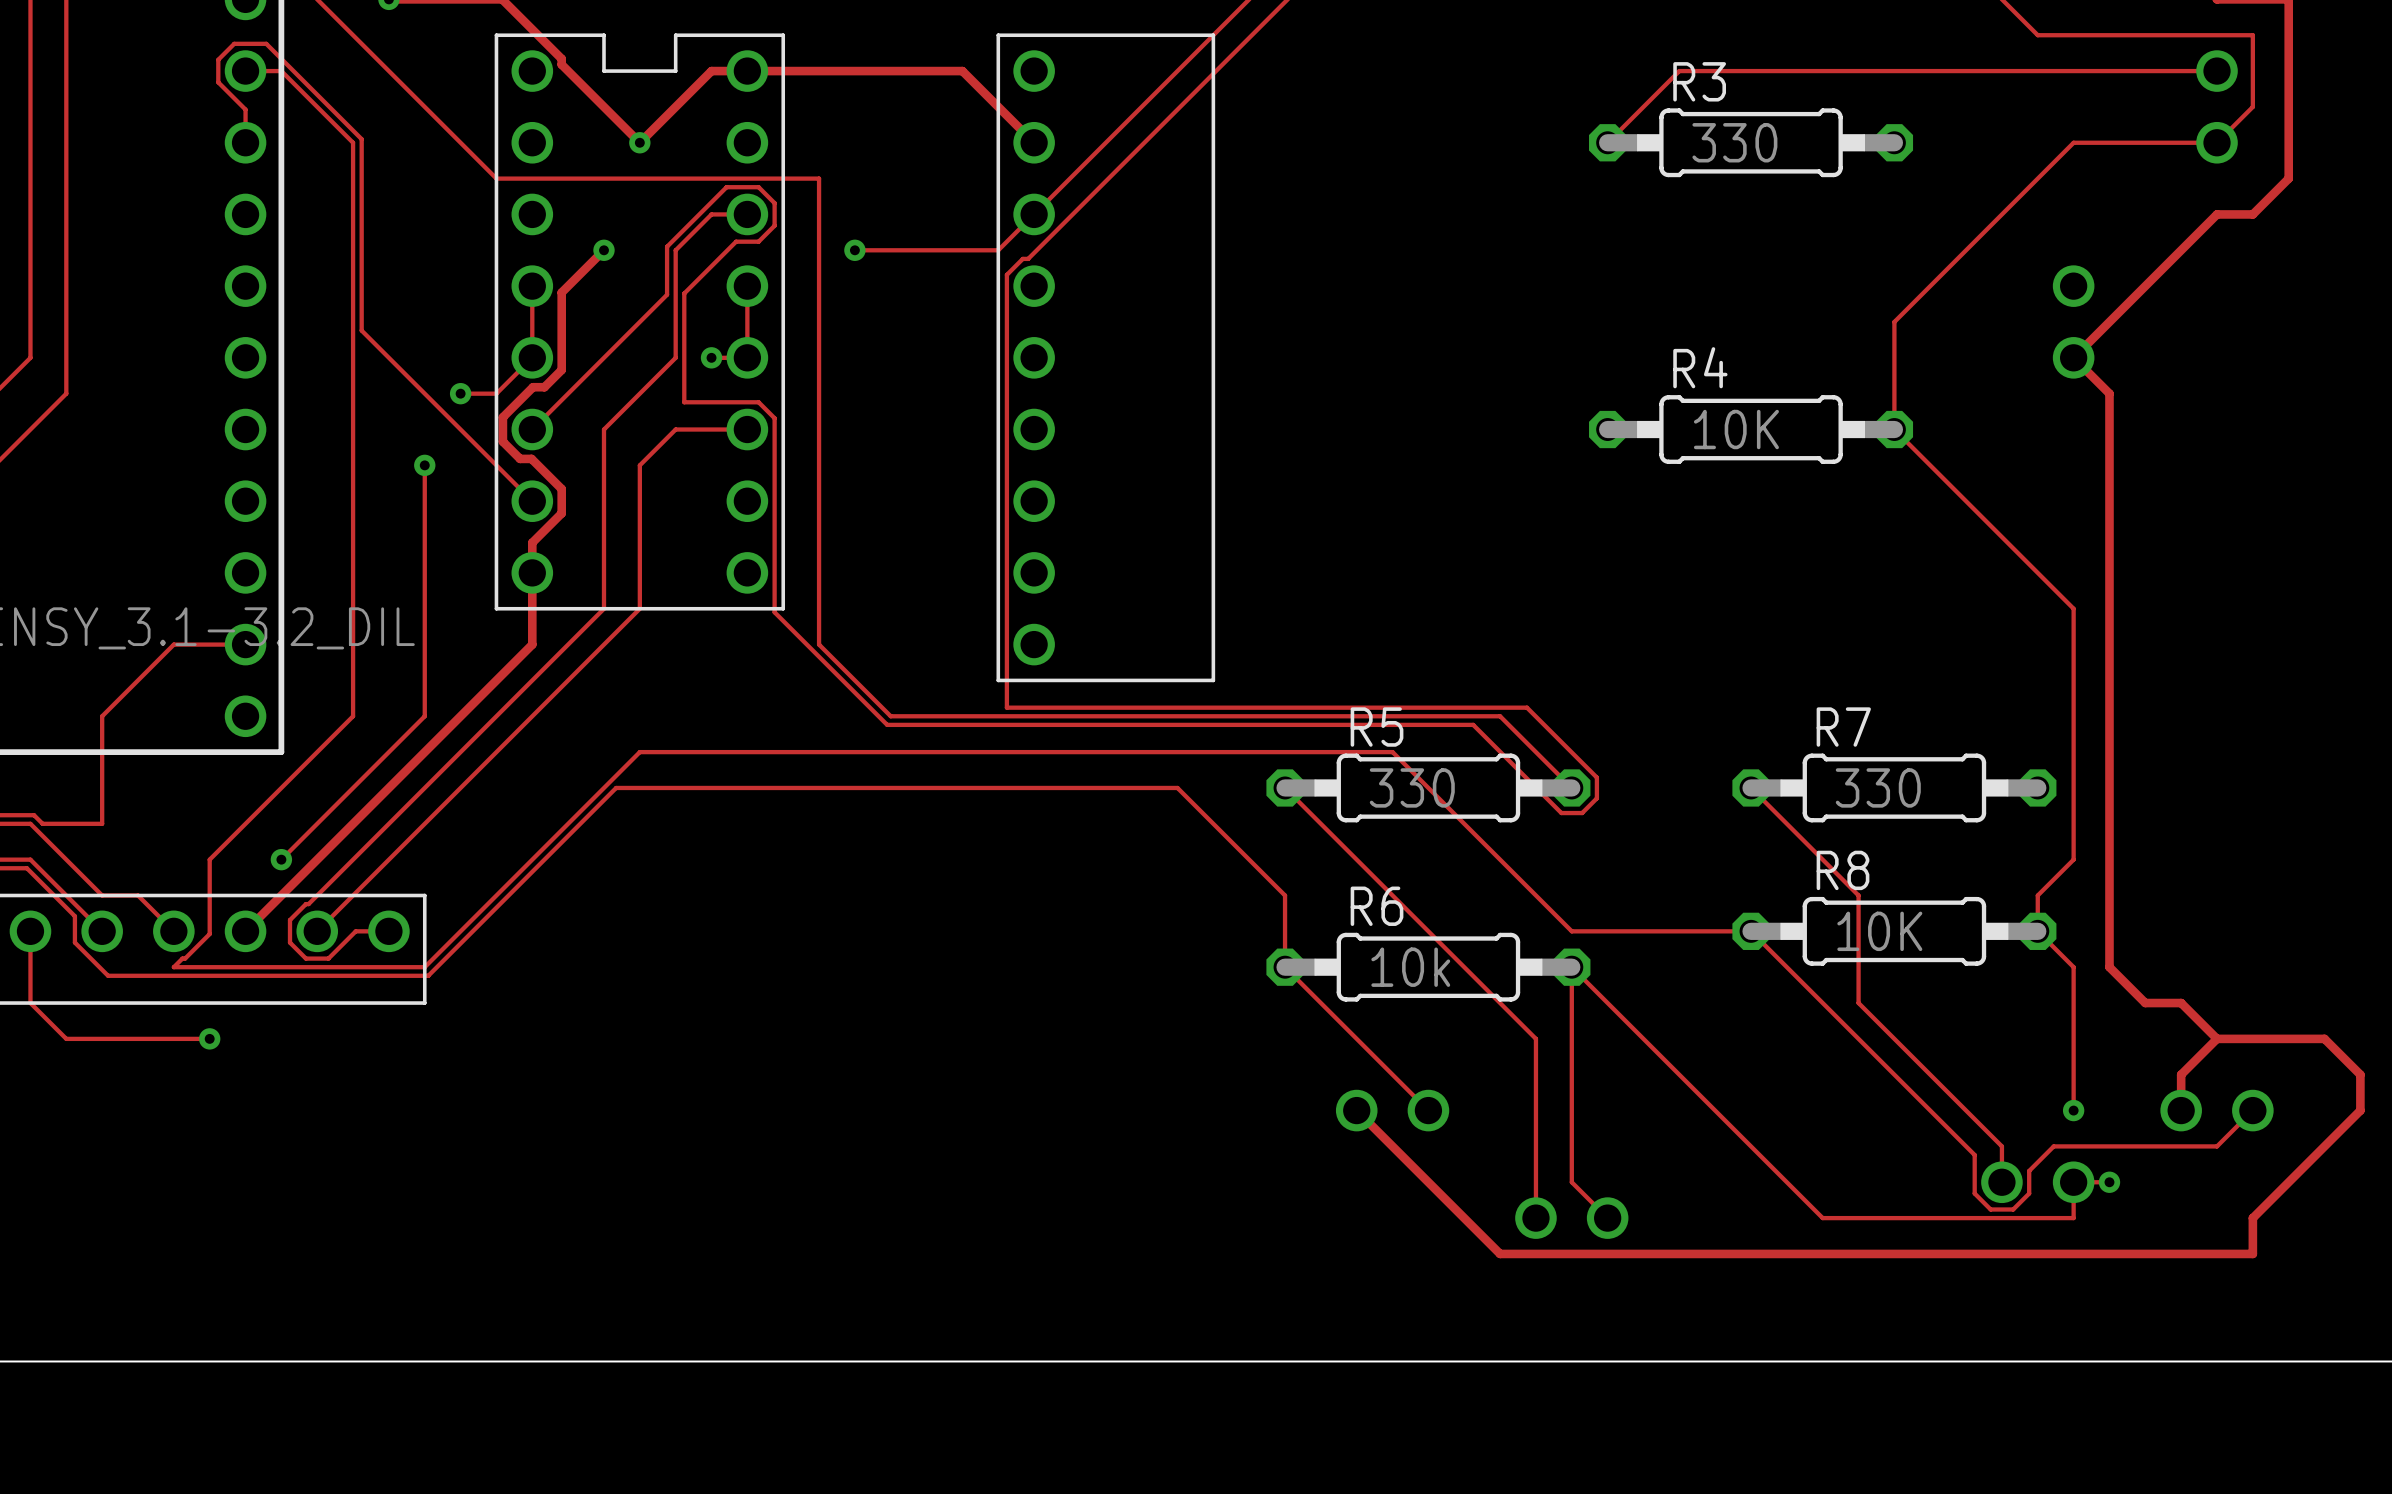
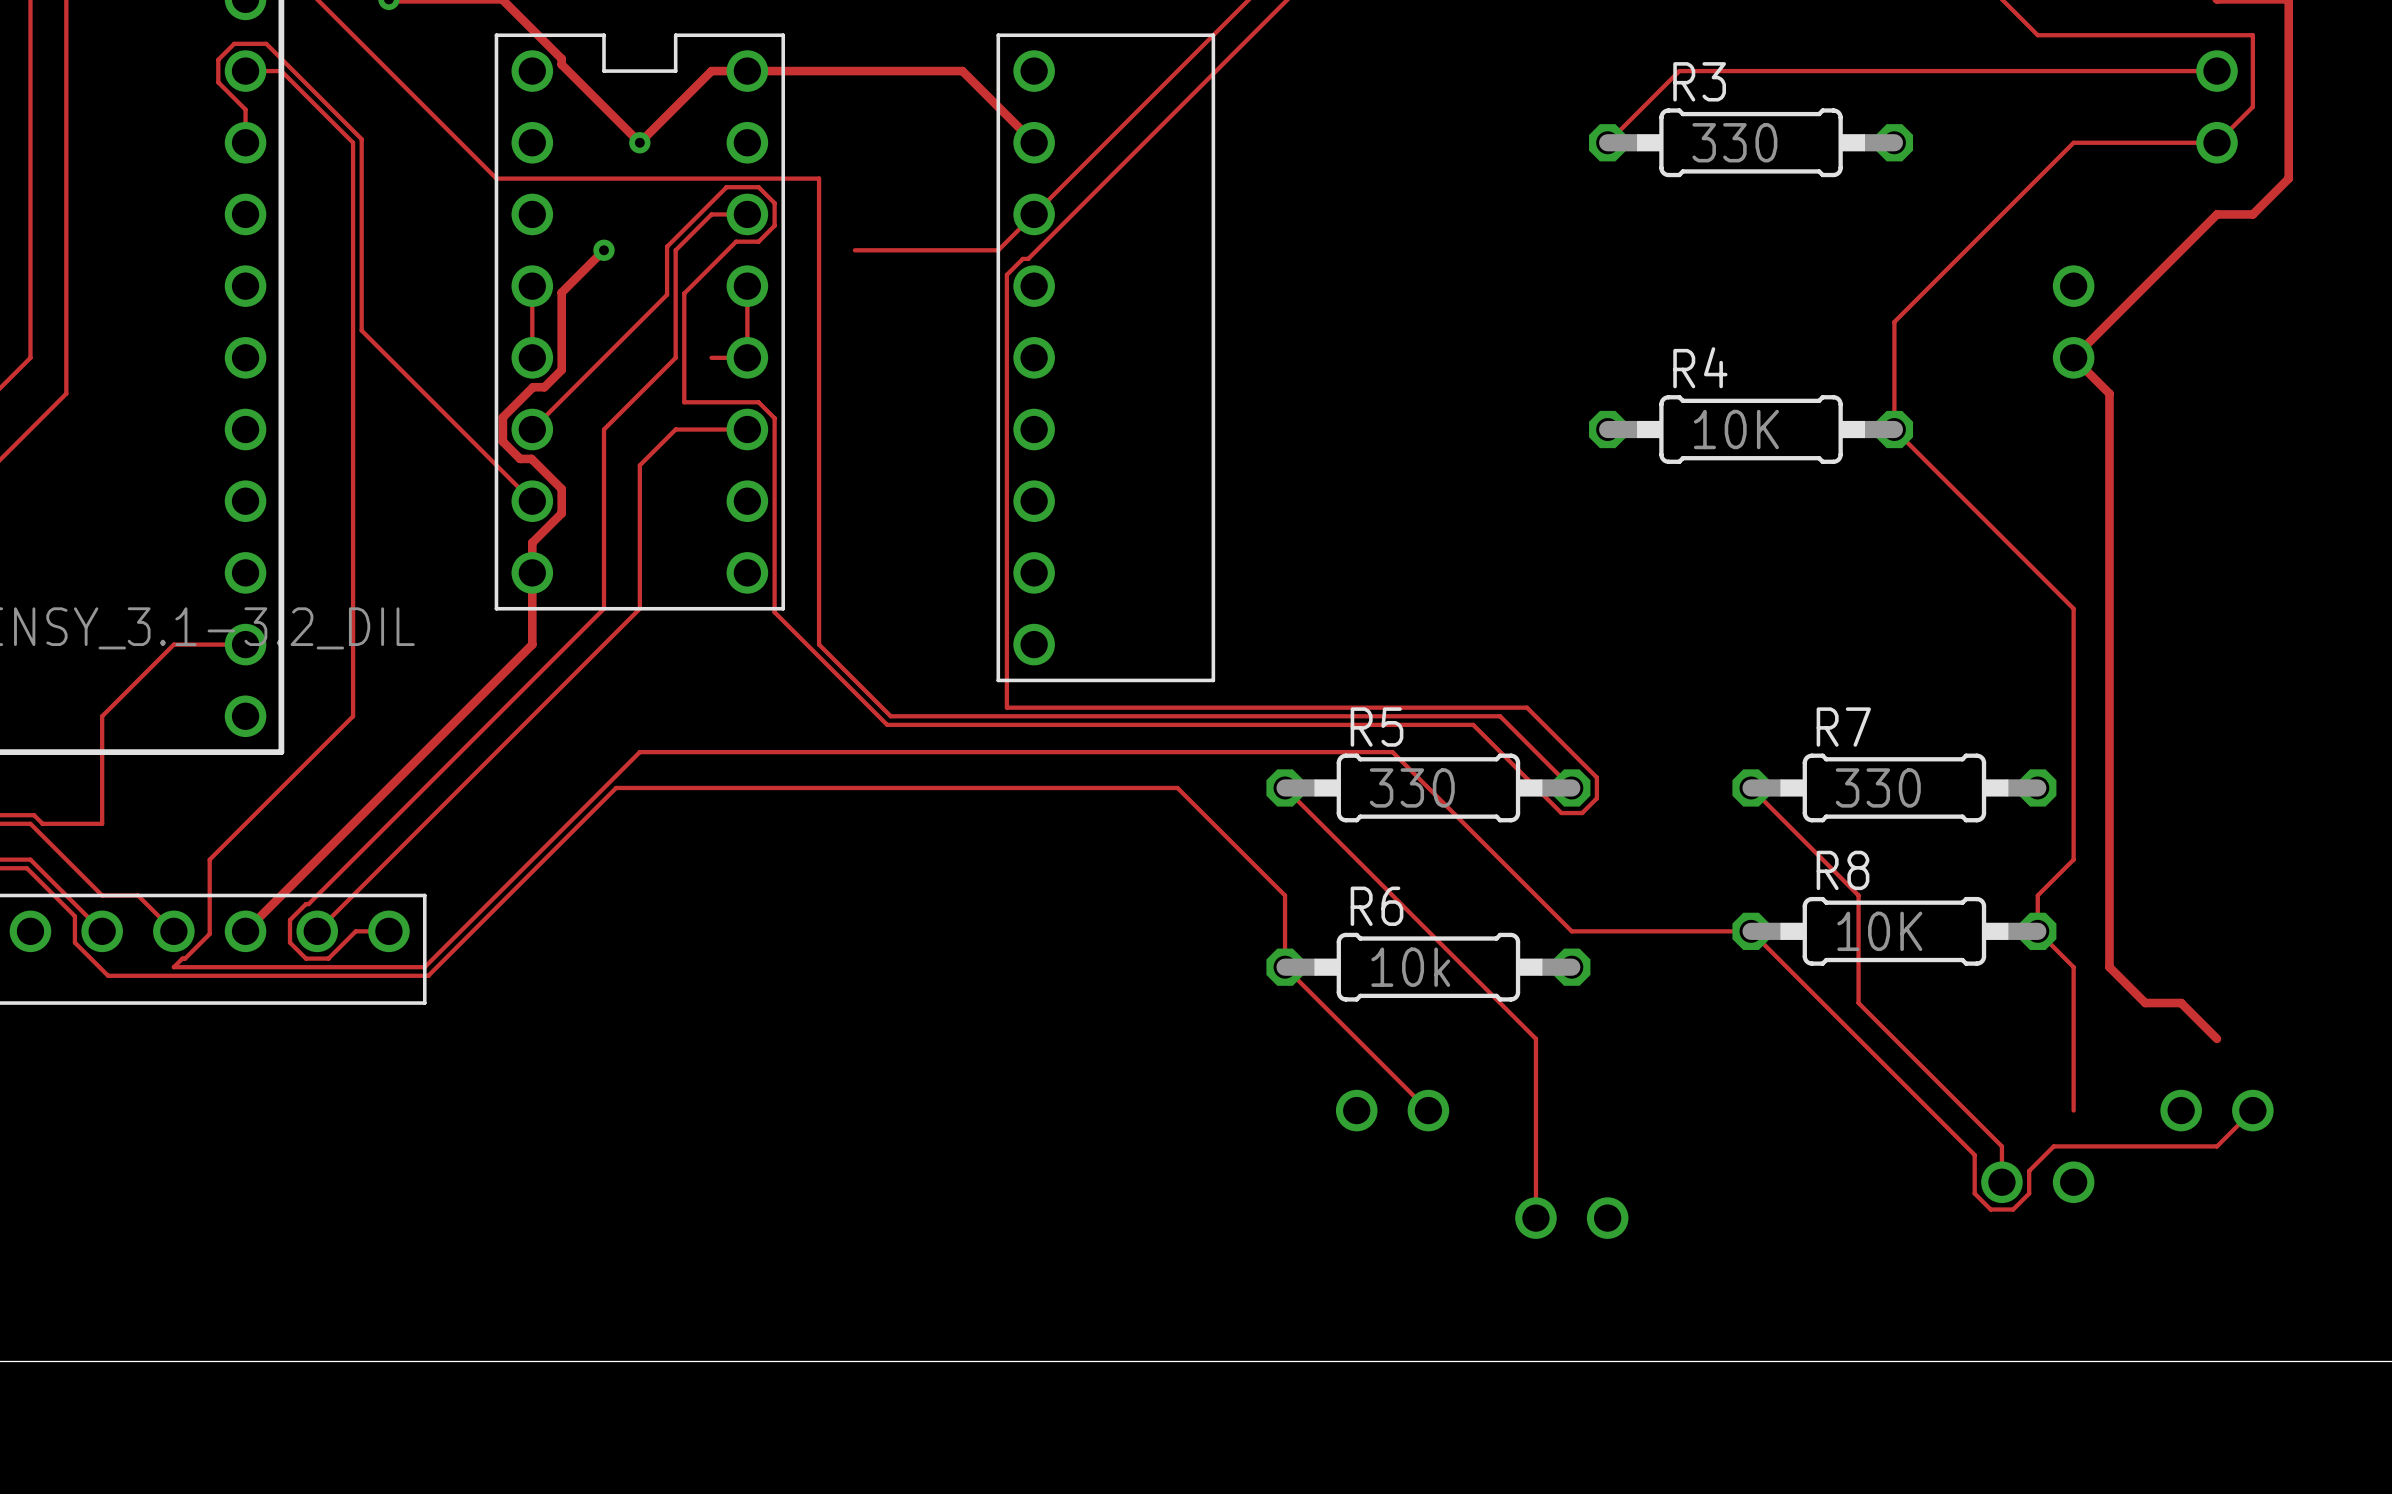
via: (854, 250) -> none
track: (532, 357) (496, 393) (460, 393) -> none
via: (711, 357) -> none
via: (460, 393) -> none
track: (424, 465) (424, 716) (281, 859) -> none
via: (424, 465) -> none
via: (281, 859) -> none
track: (30, 931) (30, 1003) (66, 1038) (209, 1038) -> none
via: (209, 1038) -> none
track: (1356, 1110) (1500, 1253) (2252, 1253) (2252, 1218) (2360, 1110) (2360, 1074) (2324, 1038) (2217, 1038) (2181, 1074) (2181, 1110) -> none
via: (2073, 1110) -> none
track: (2109, 1182) (2073, 1182) (2073, 1218) (1822, 1218) (1571, 967) (1571, 1182) (1607, 1218) -> none
via: (2109, 1182) -> none

